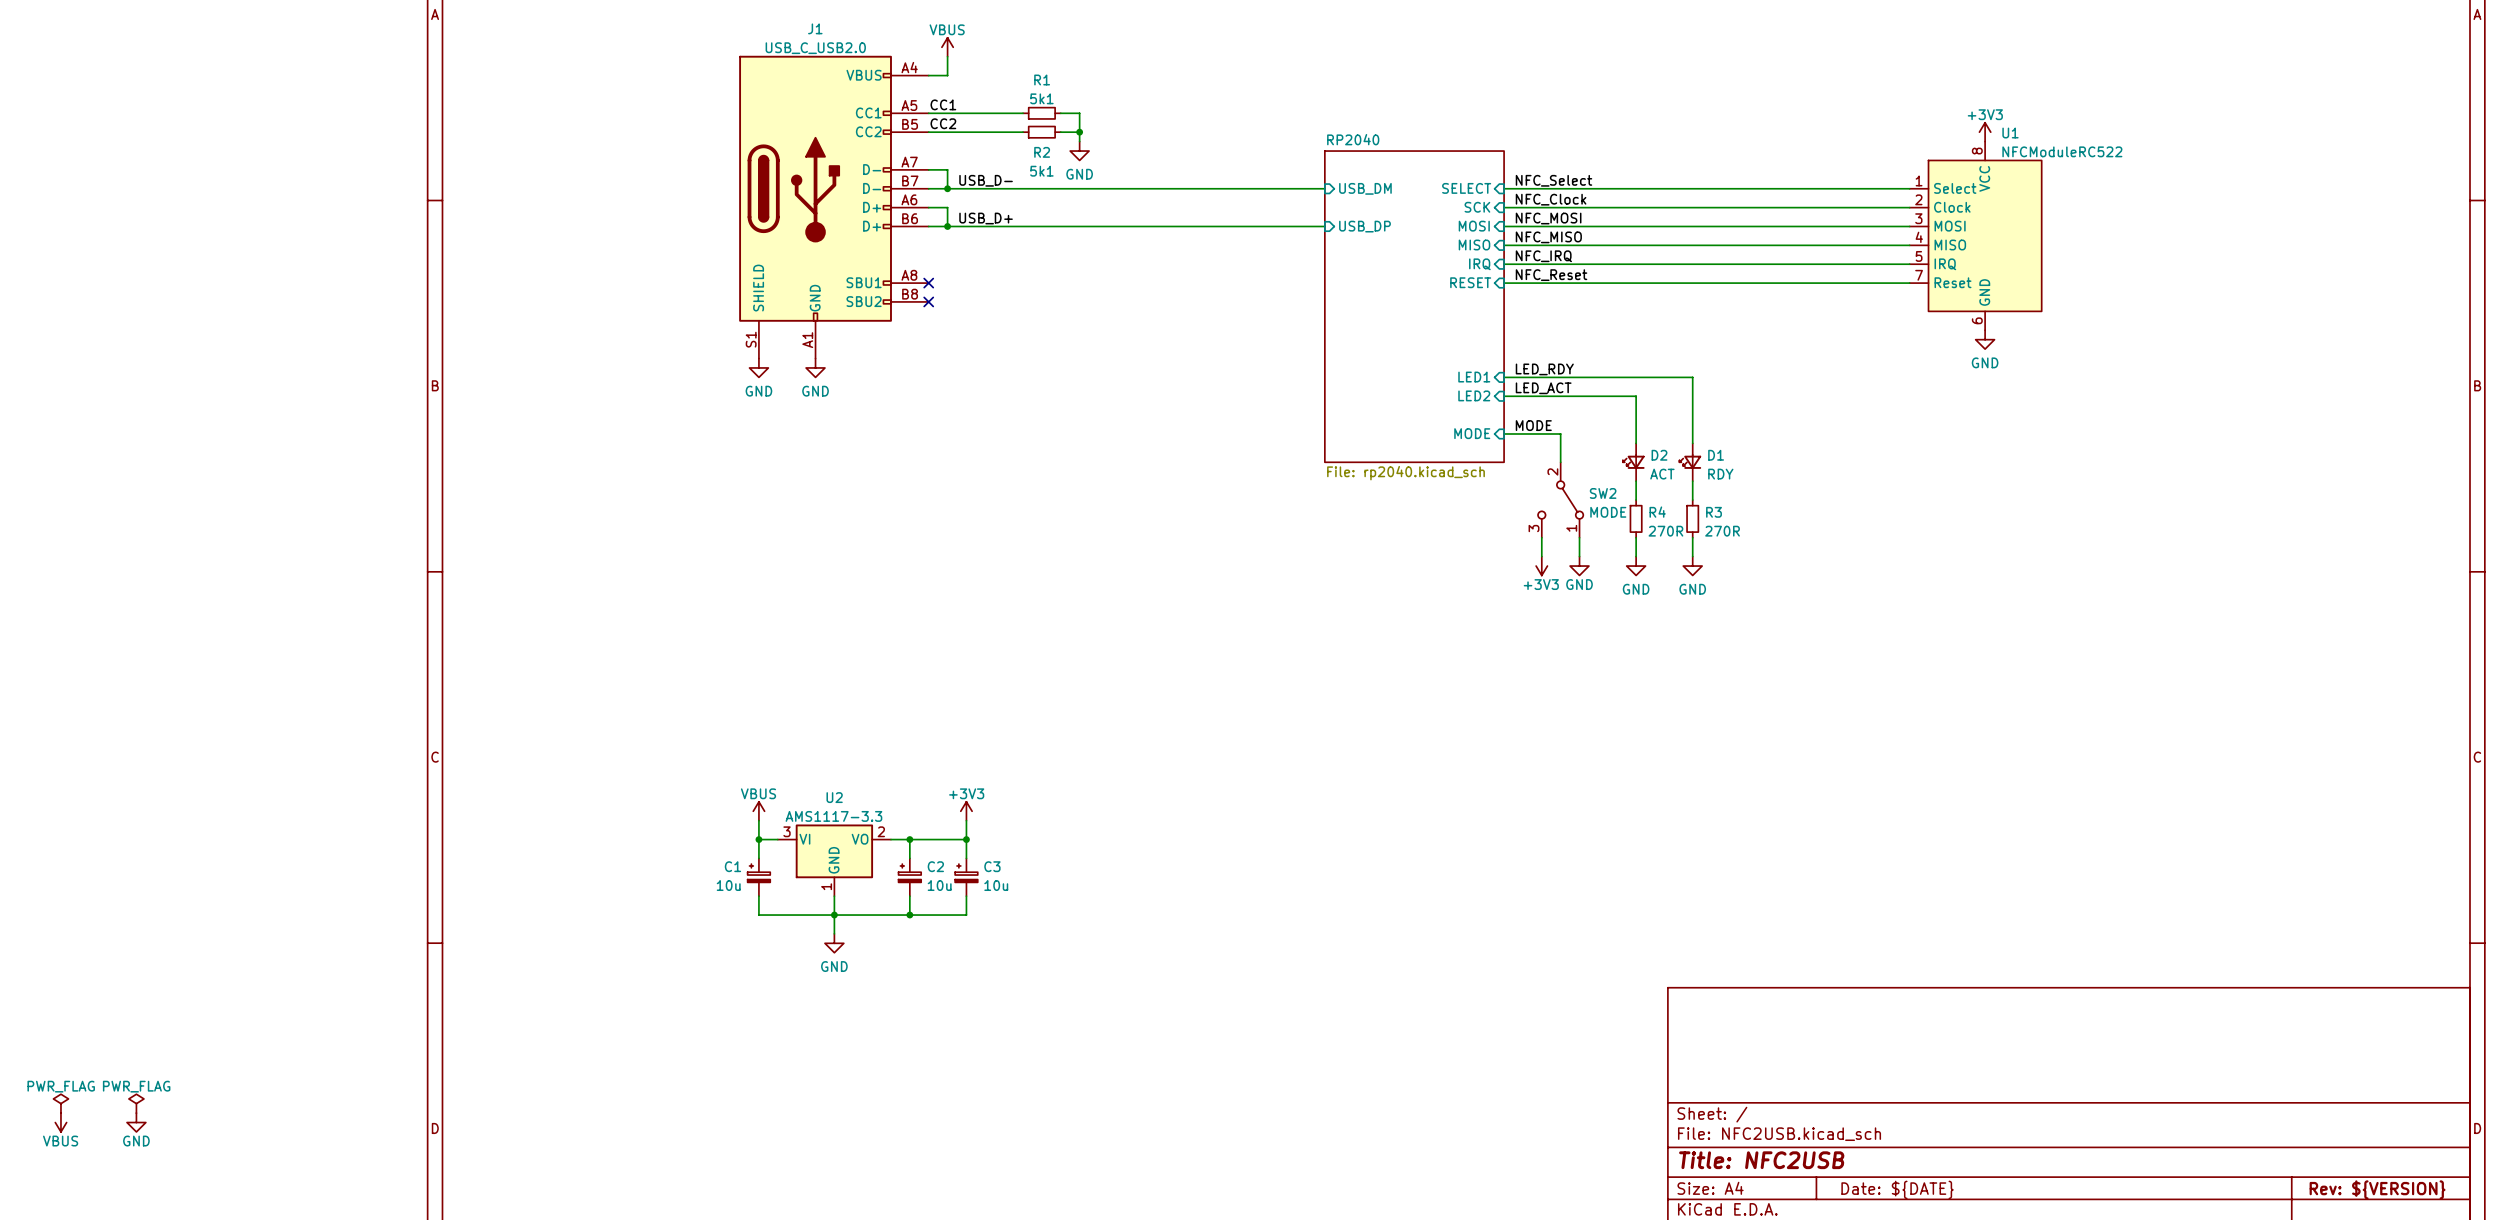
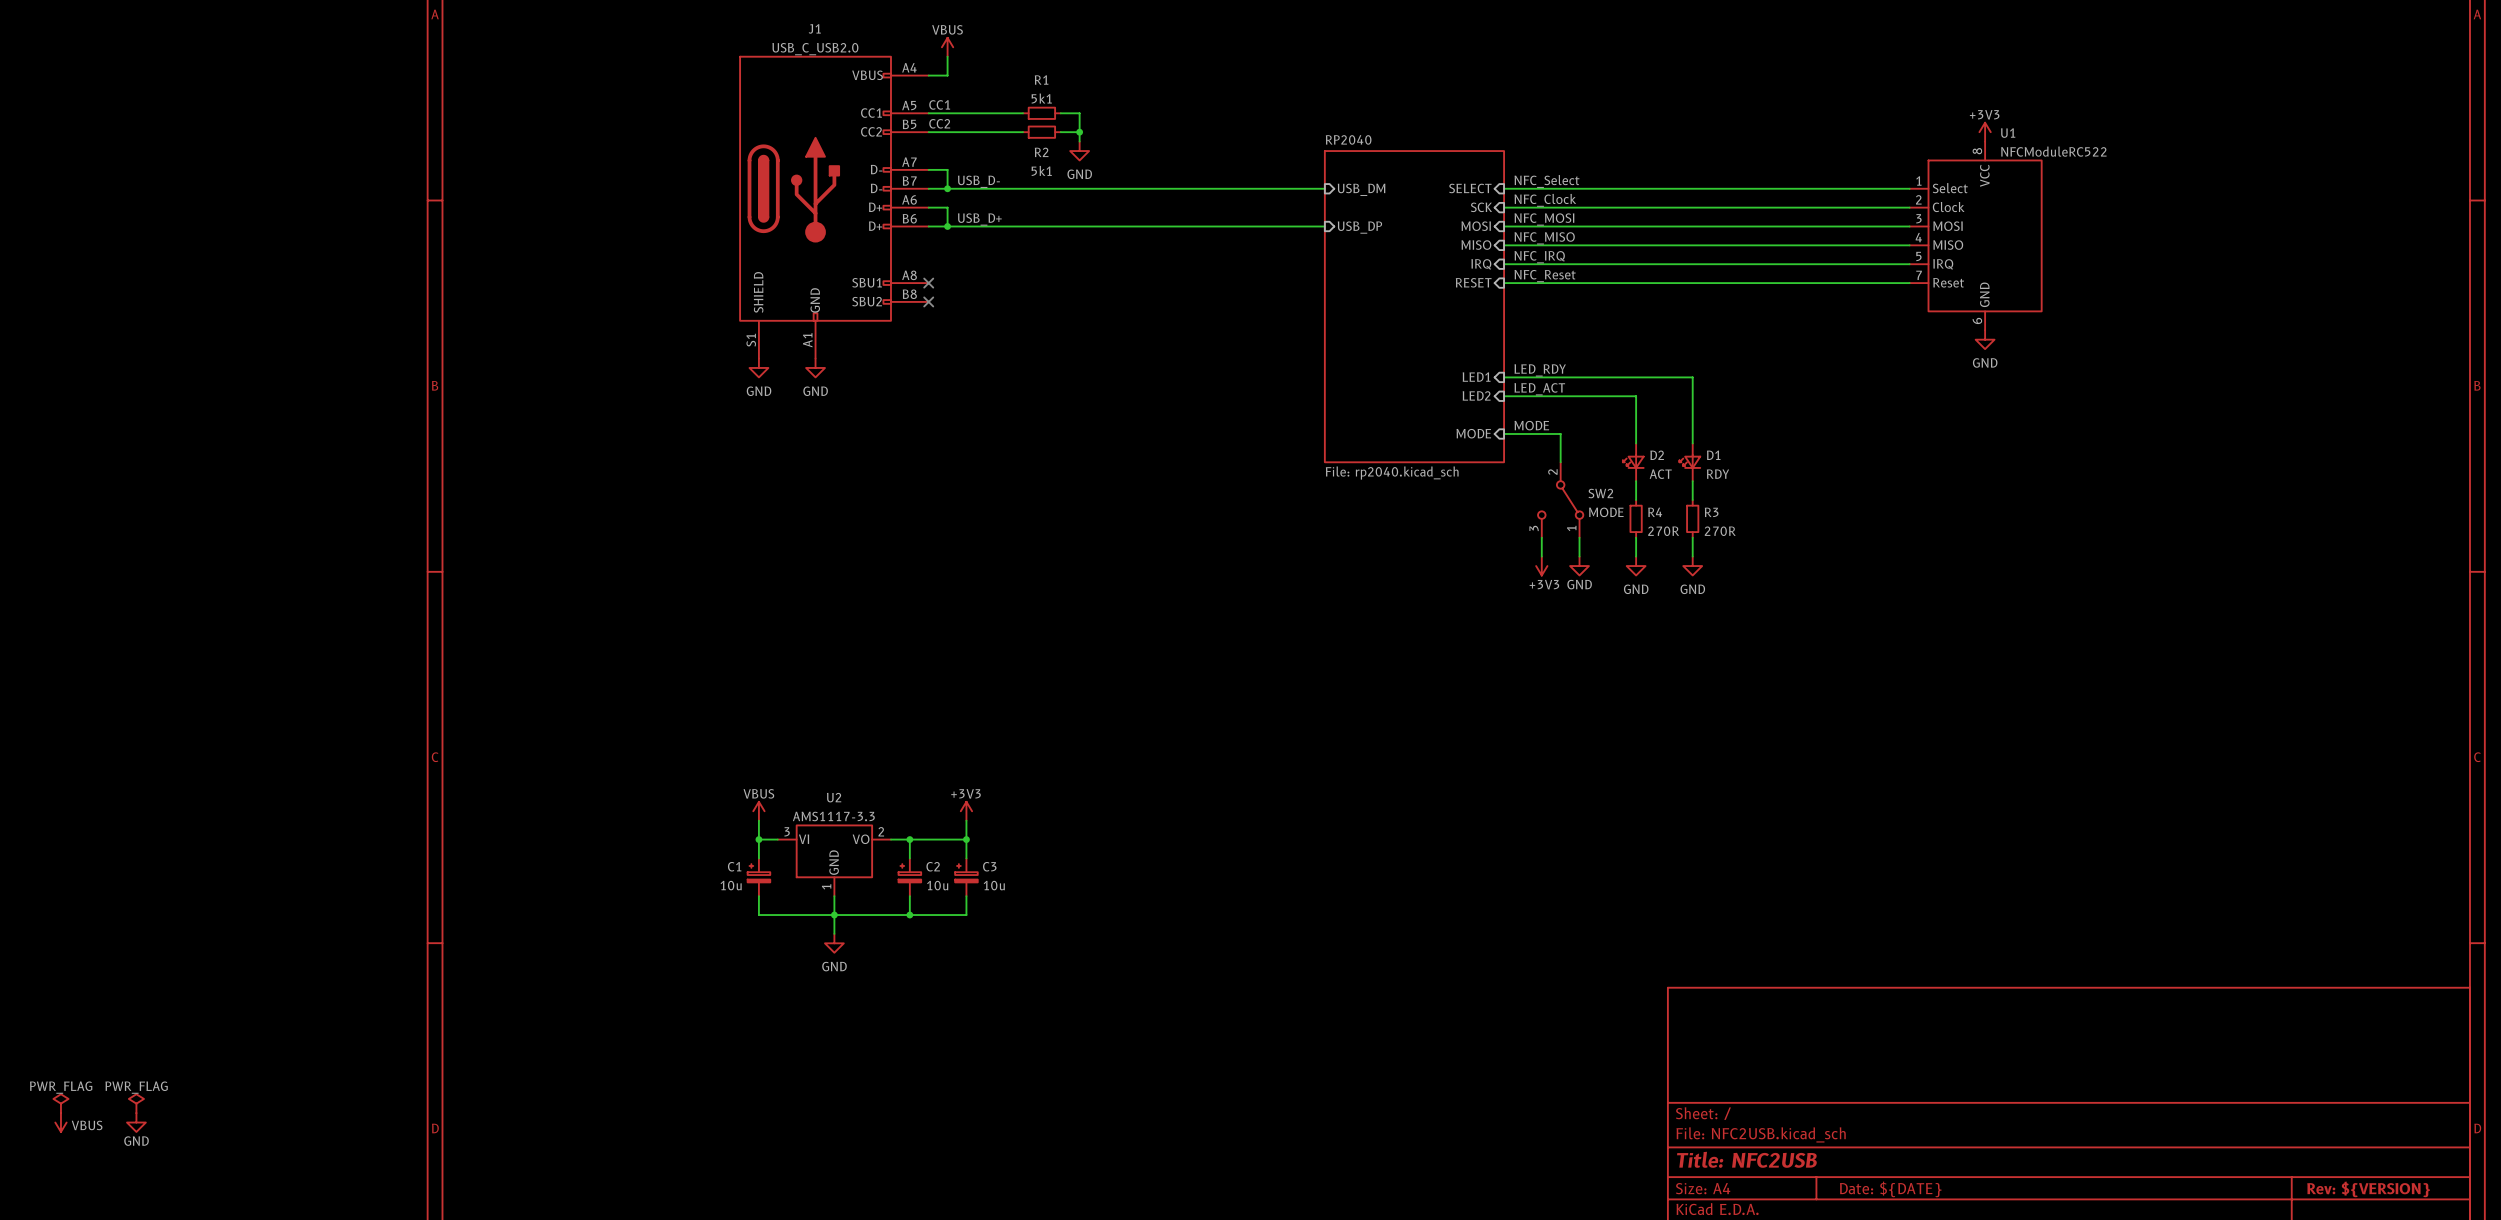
power symbol text position: VBUS (60, 1141) -> VBUS (87, 1125)

